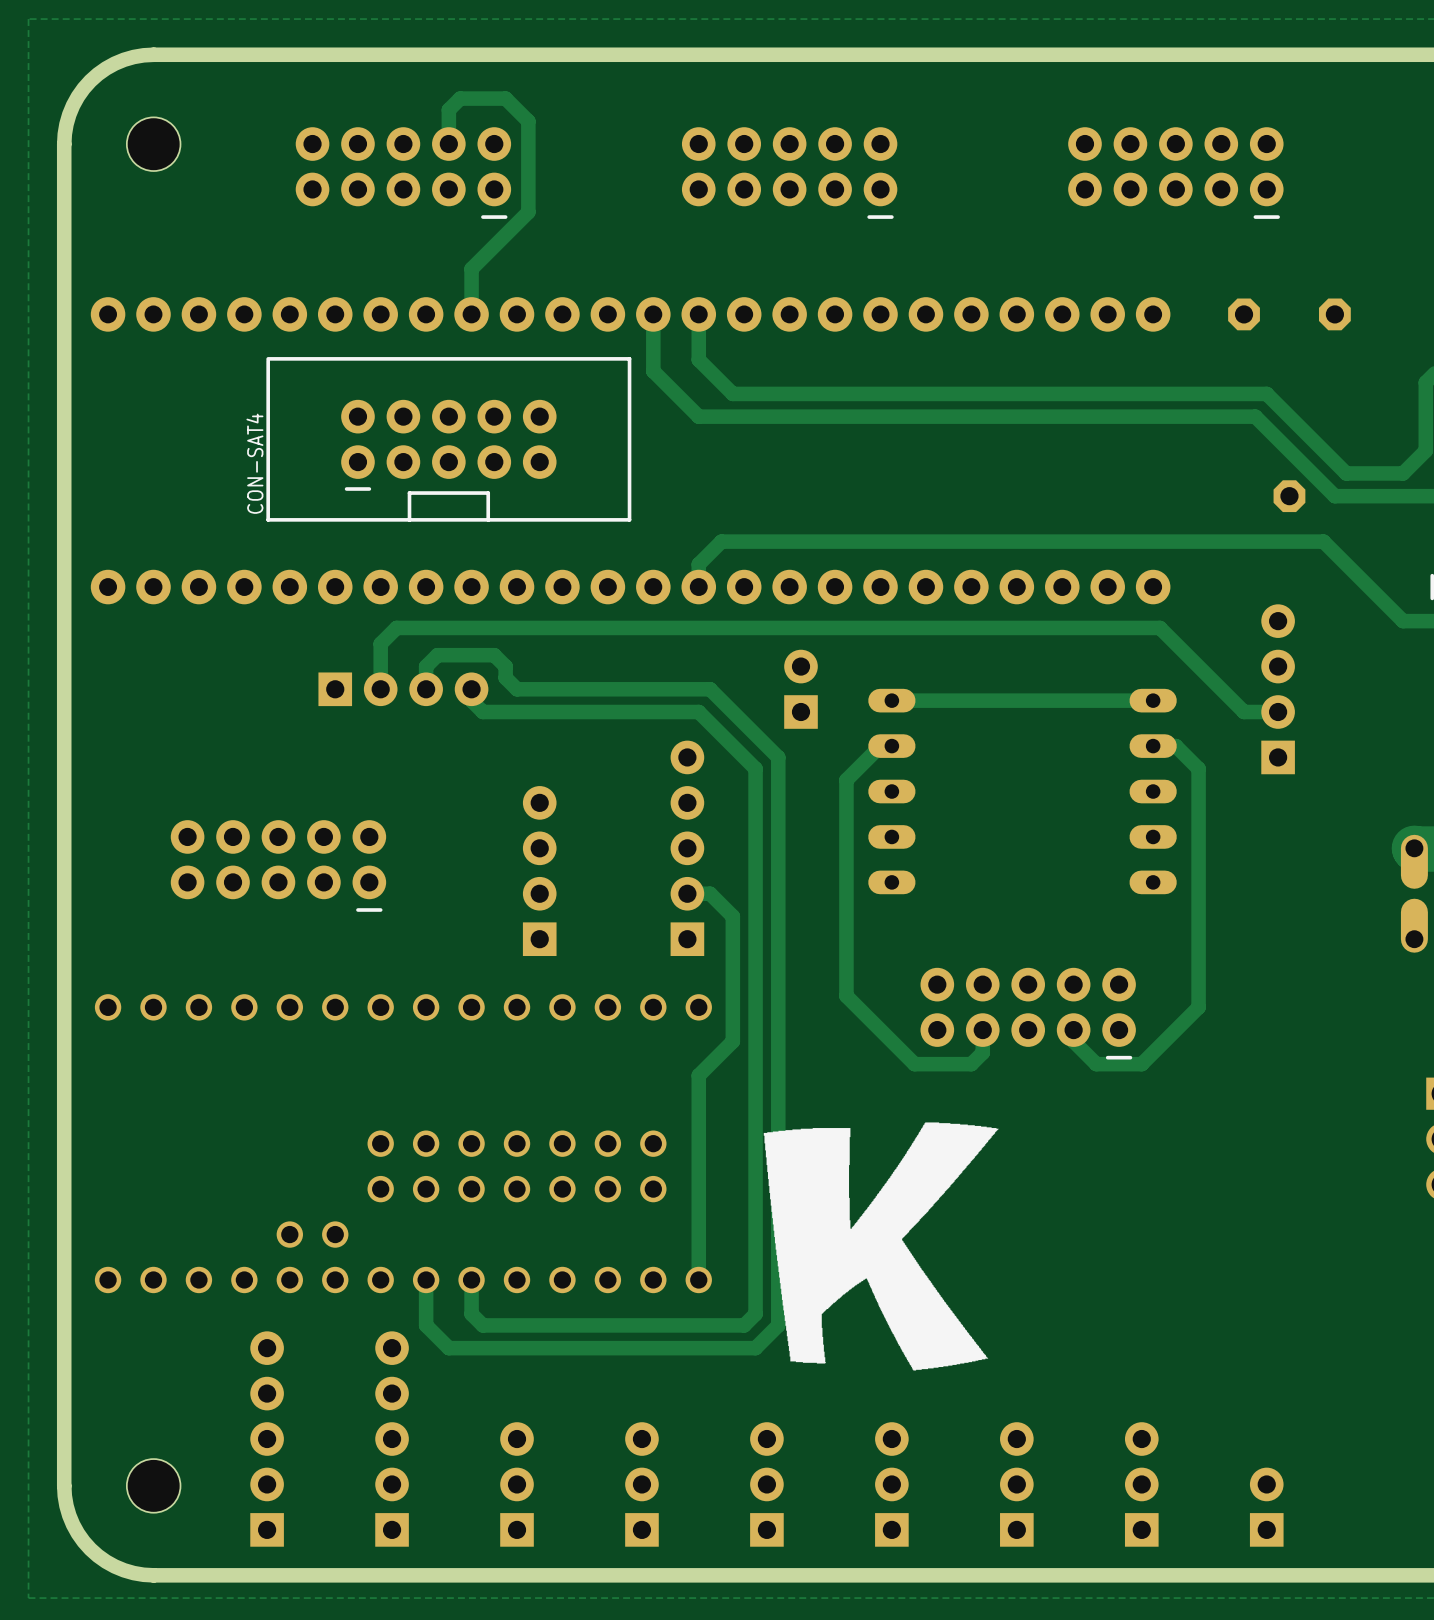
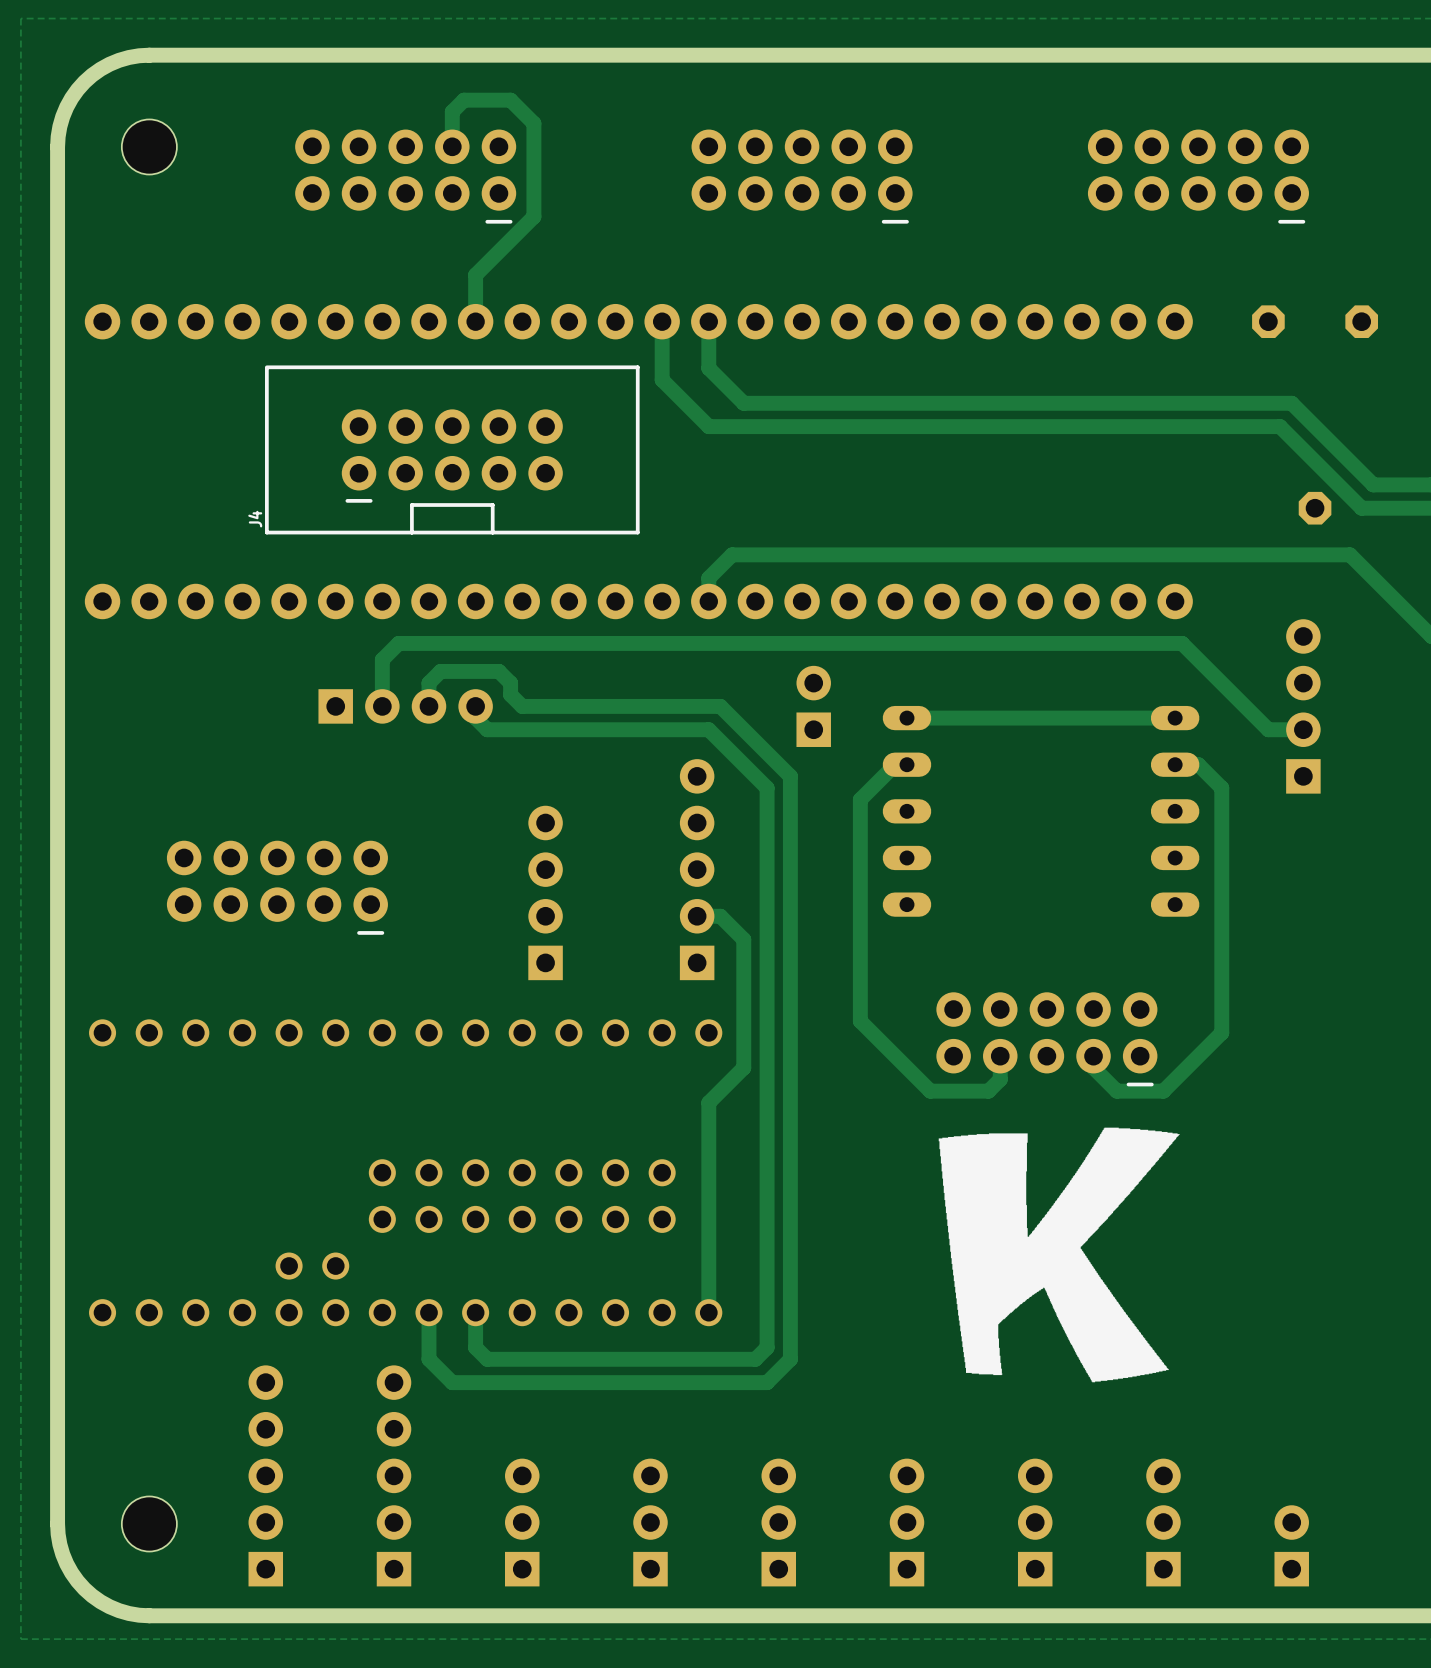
CON-SAT4 name: CON-SAT4 (254, 463) -> J4 (255, 519)
drawing position: (881, 1246) -> (1059, 1254)

